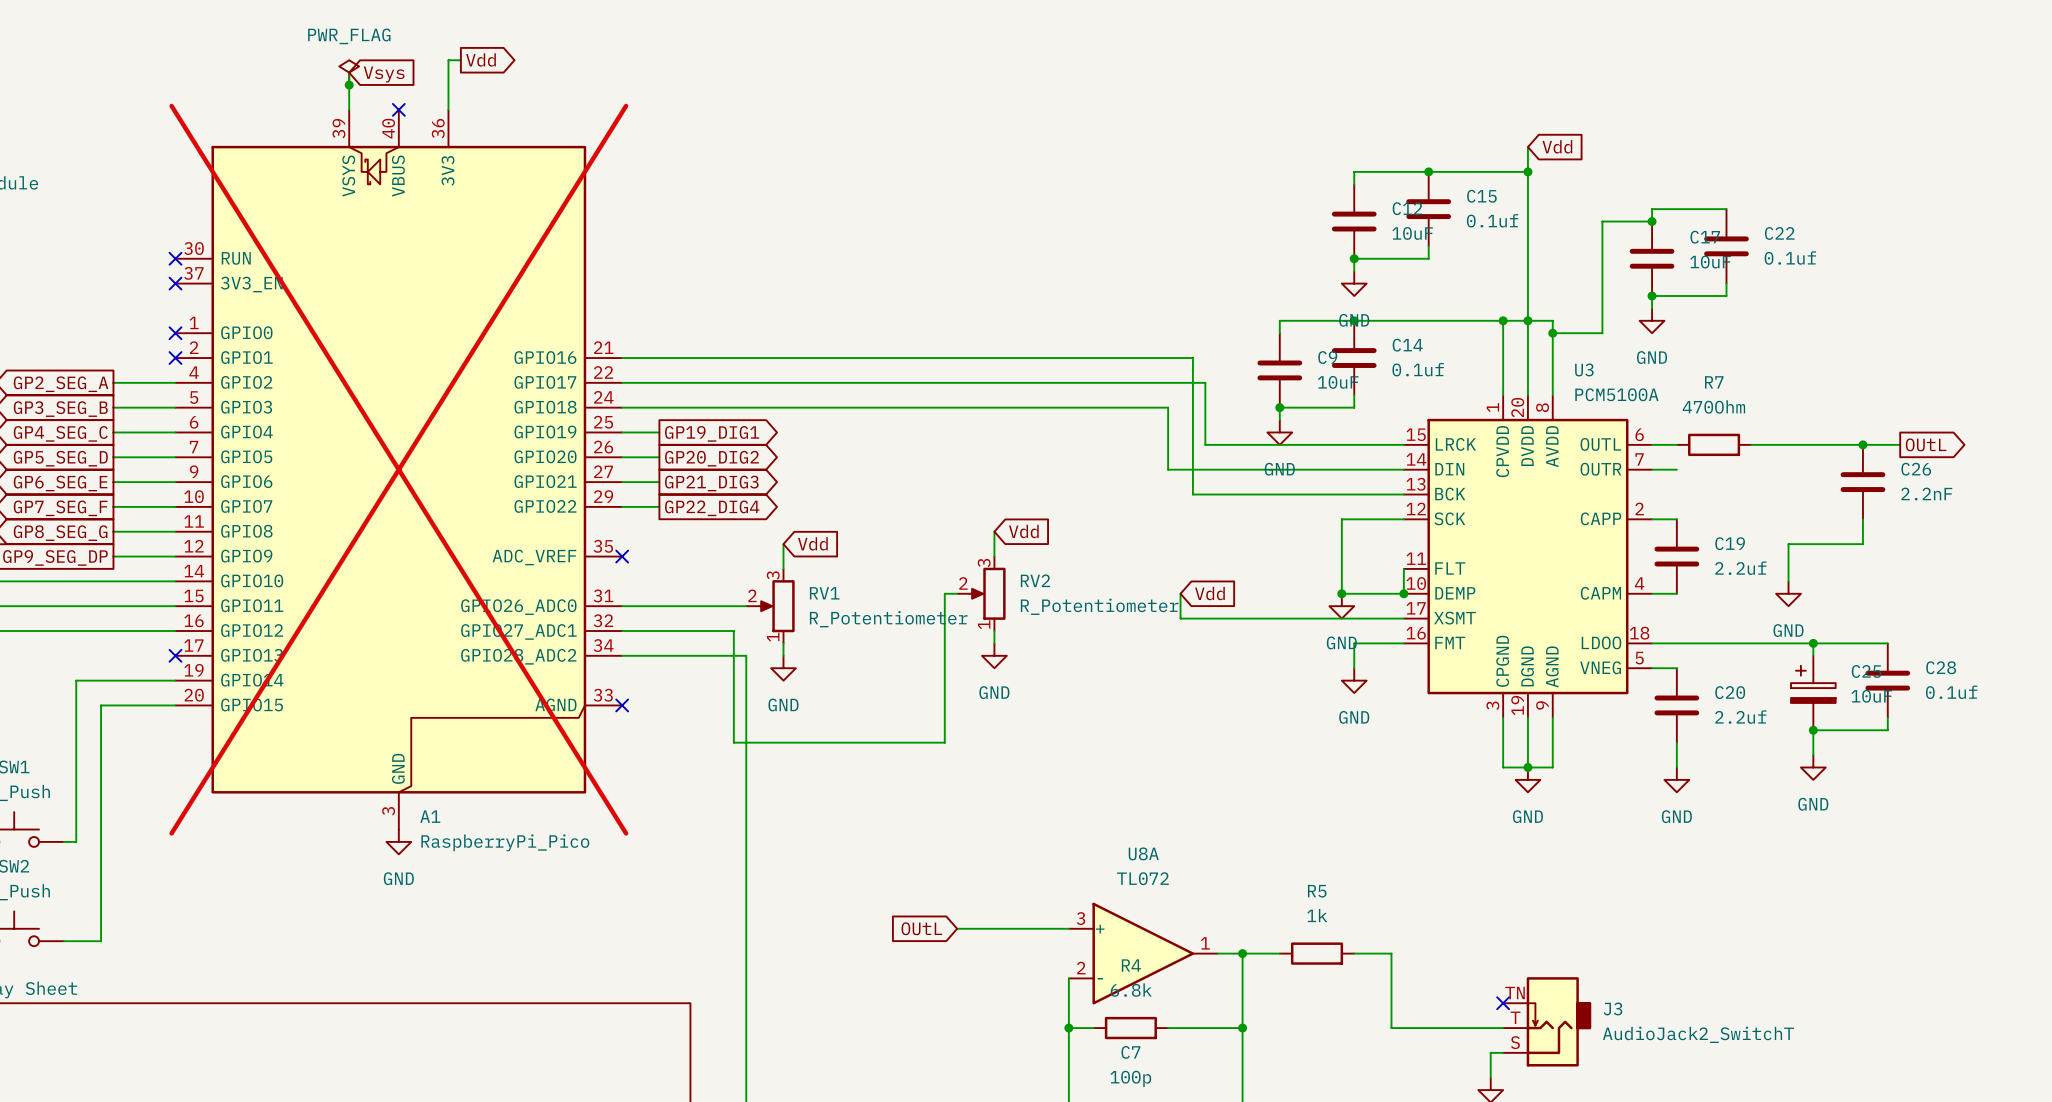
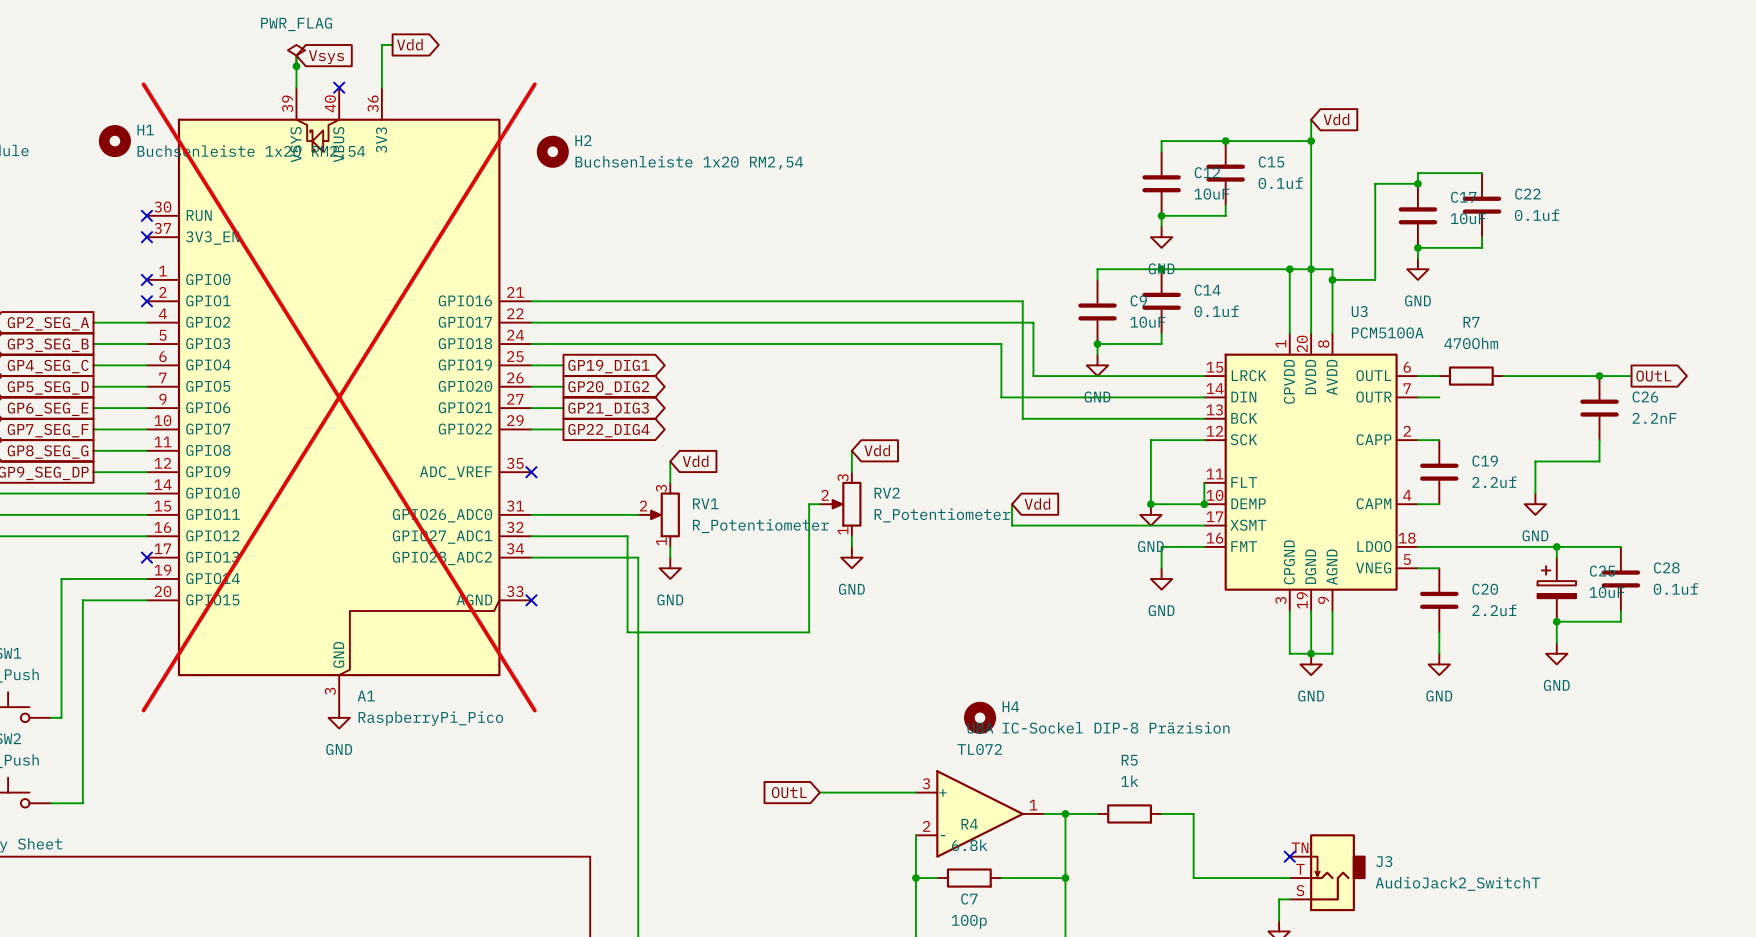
H1: none -> Buchsenleiste 1x20 RM2,54 (114, 141)
H2: none -> Buchsenleiste 1x20 RM2,54 (552, 151)
H4: none -> IC-Sockel DIP-8 Präzision (980, 717)

